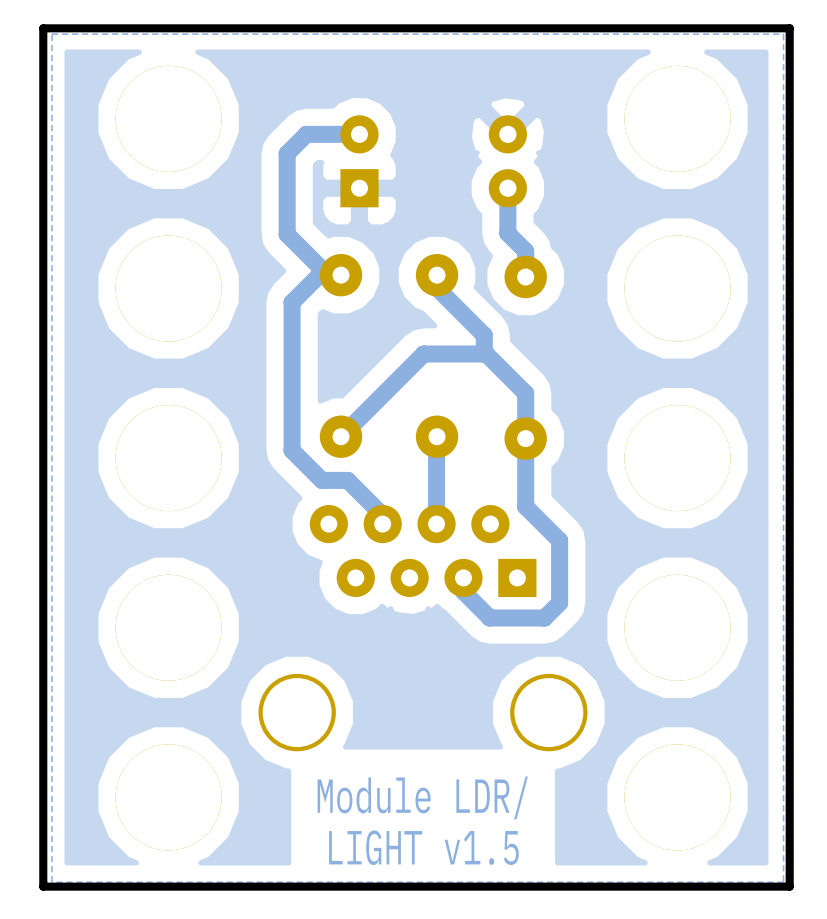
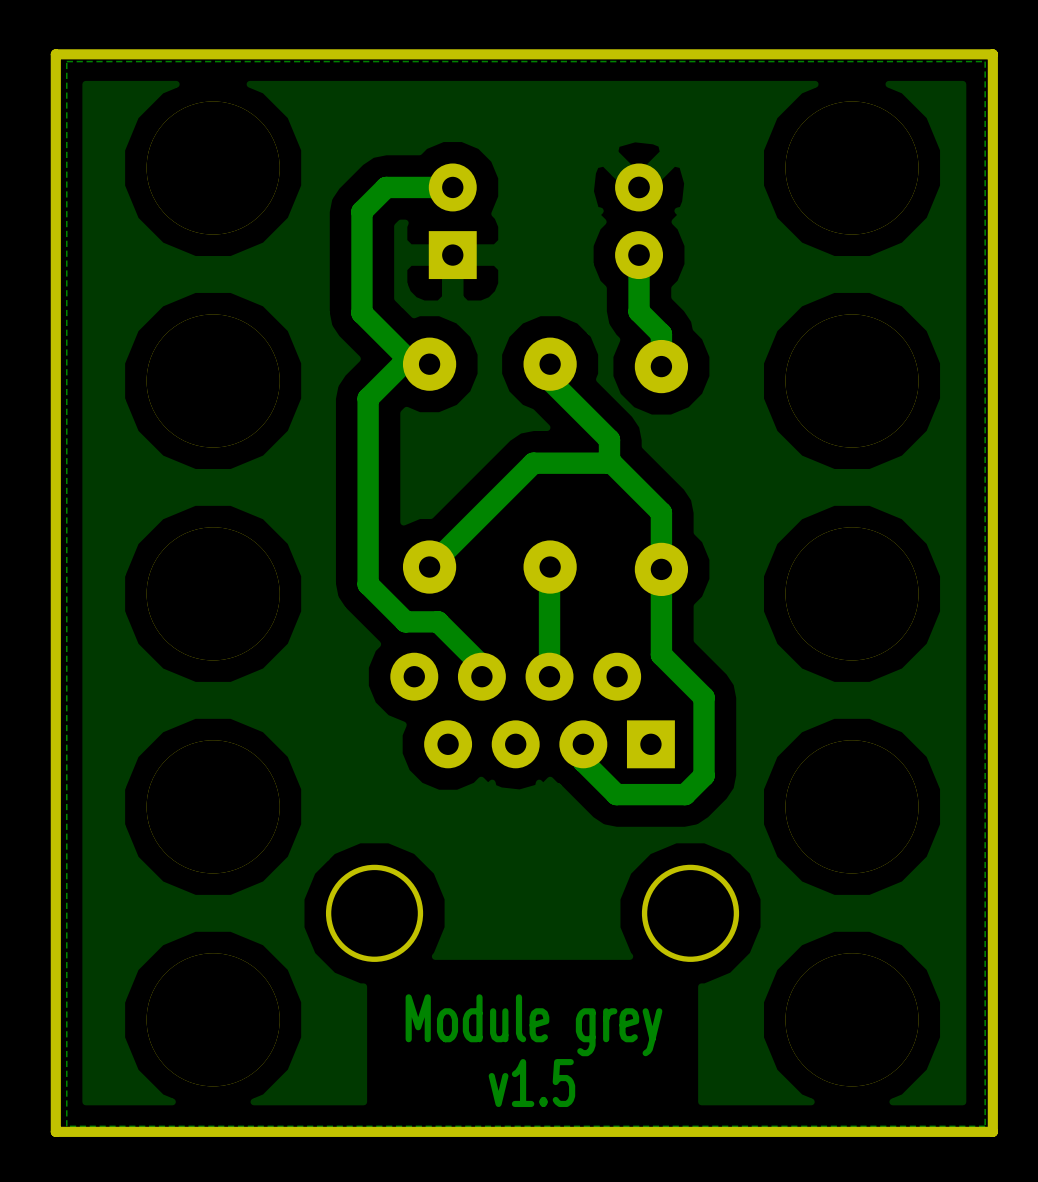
text: Module LDR/ (422, 797) -> Module grey (533, 1025)
text: LIGHT v1.5 (423, 847) -> v1.5 (531, 1083)

